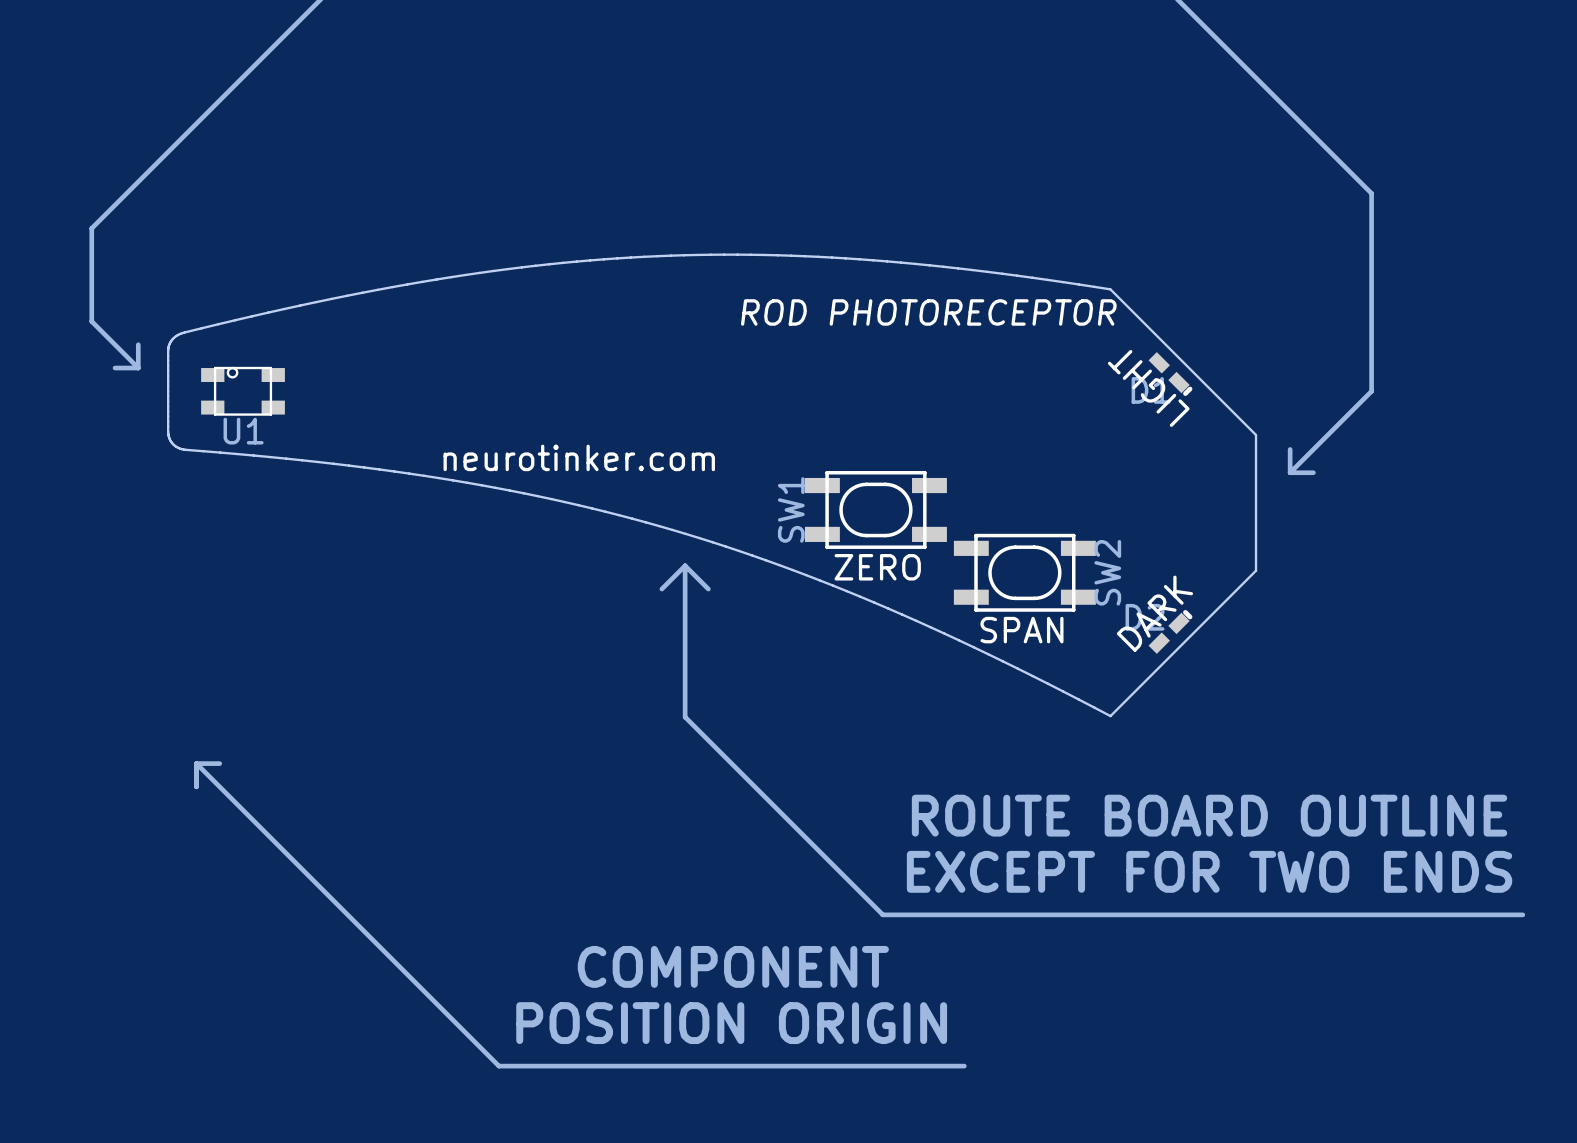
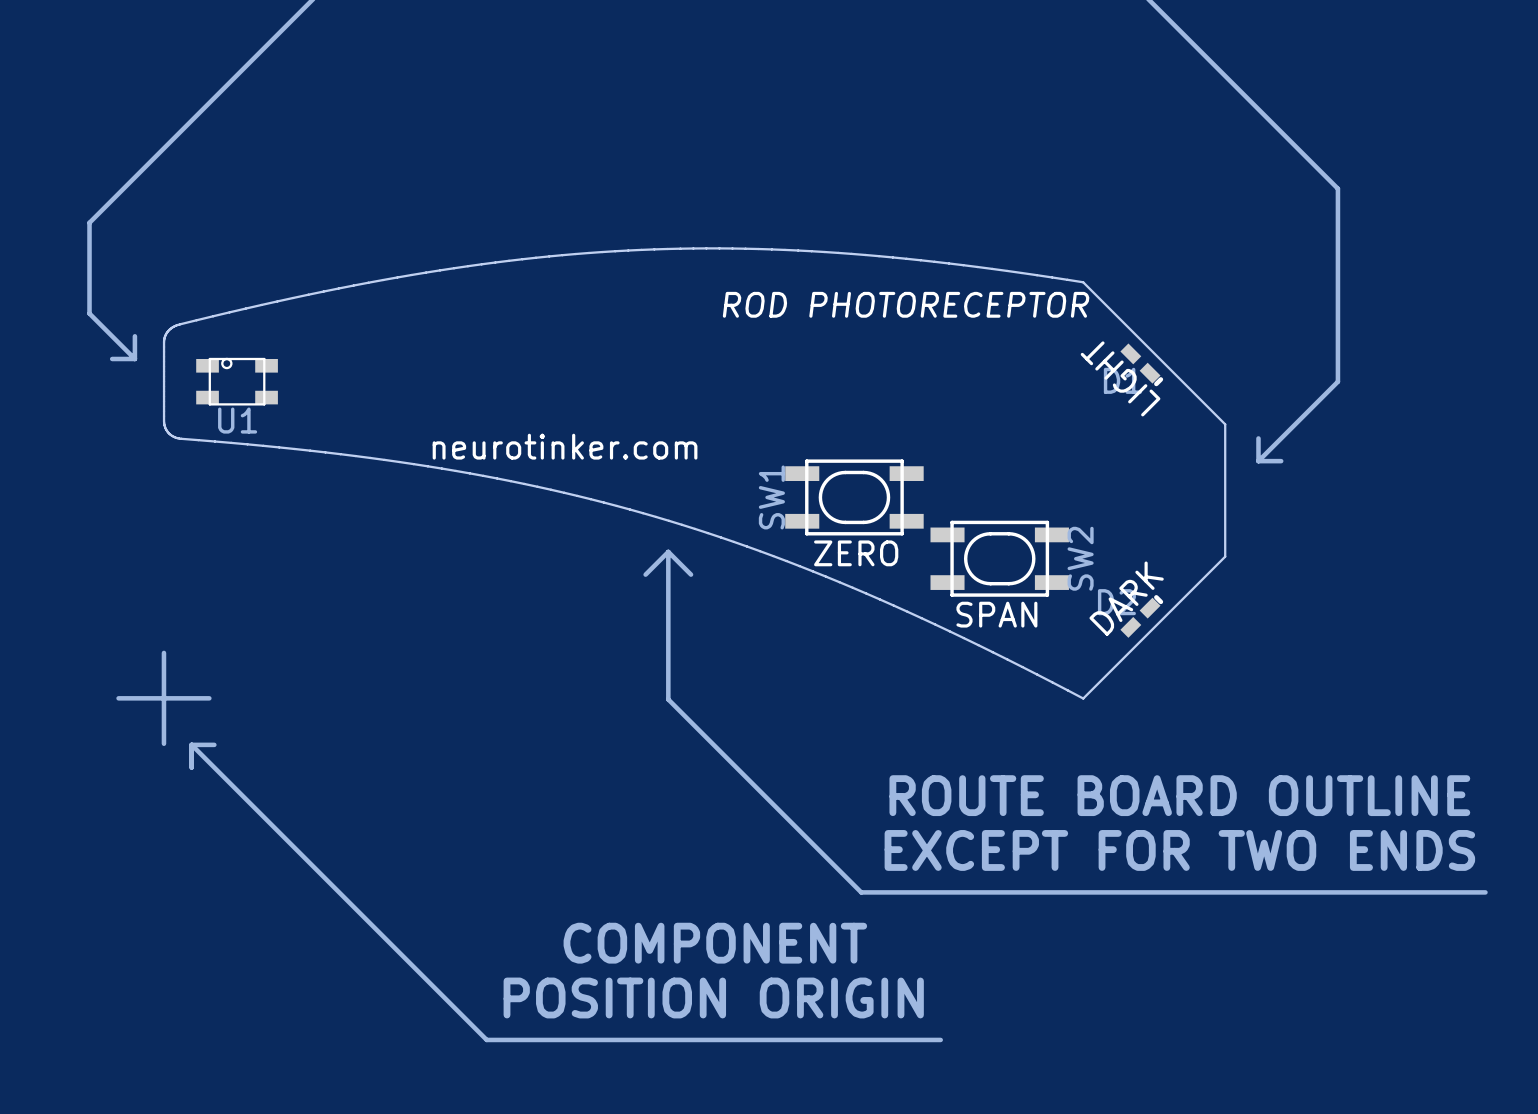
line: none -> (163, 652) (163, 743)
line: none -> (118, 698) (209, 698)

